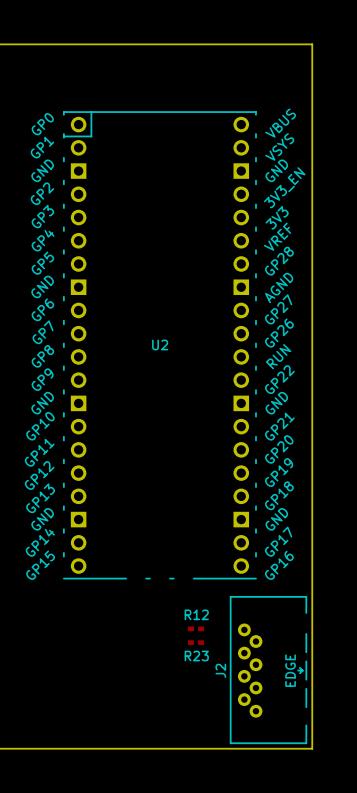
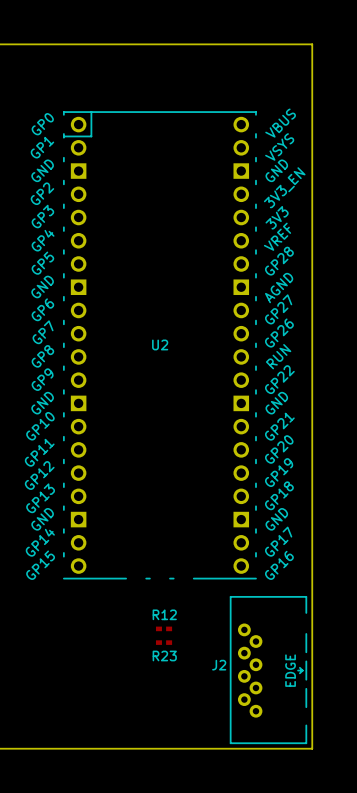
R12 position: (196, 628) -> (164, 628)
R23 position: (196, 642) -> (164, 642)
J2 name rotation: 0° (220, 670) -> 90° clockwise (219, 665)

